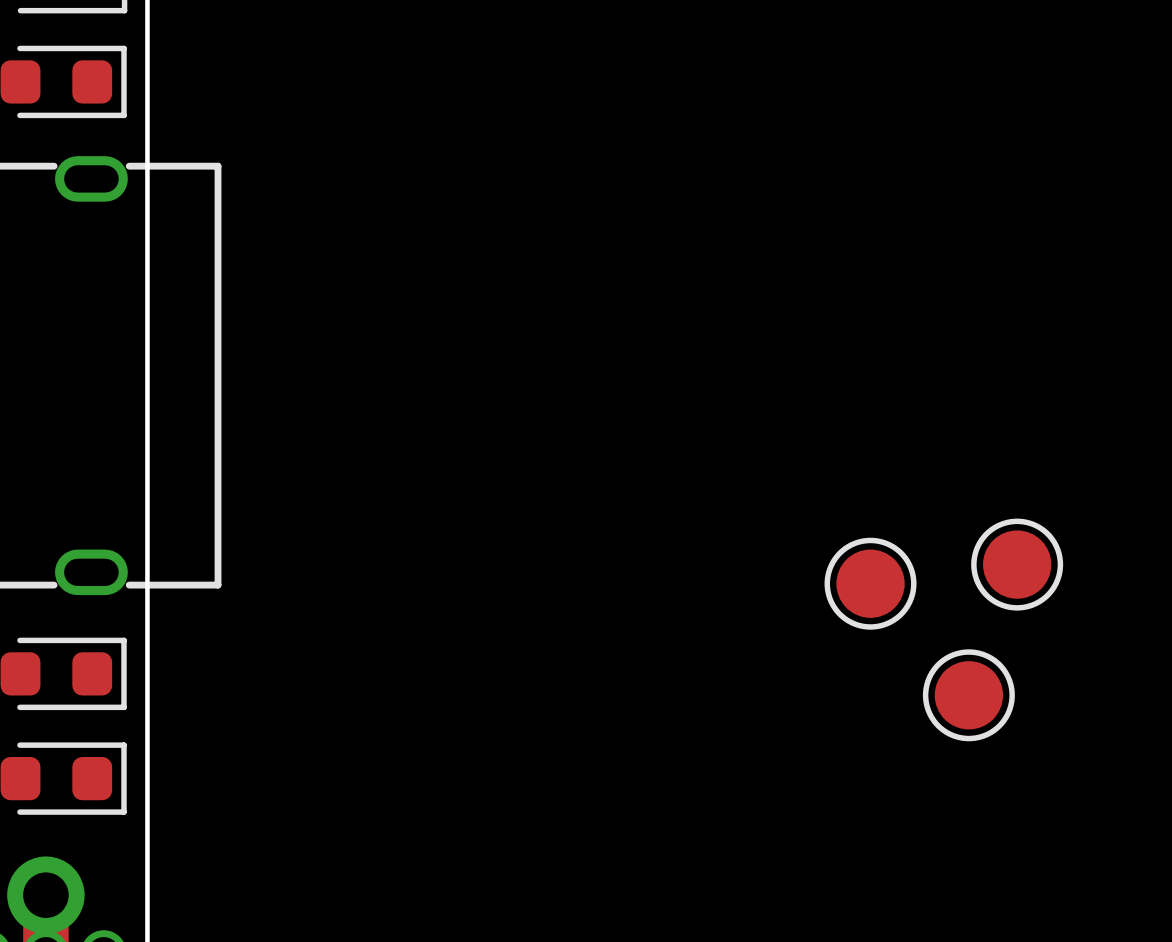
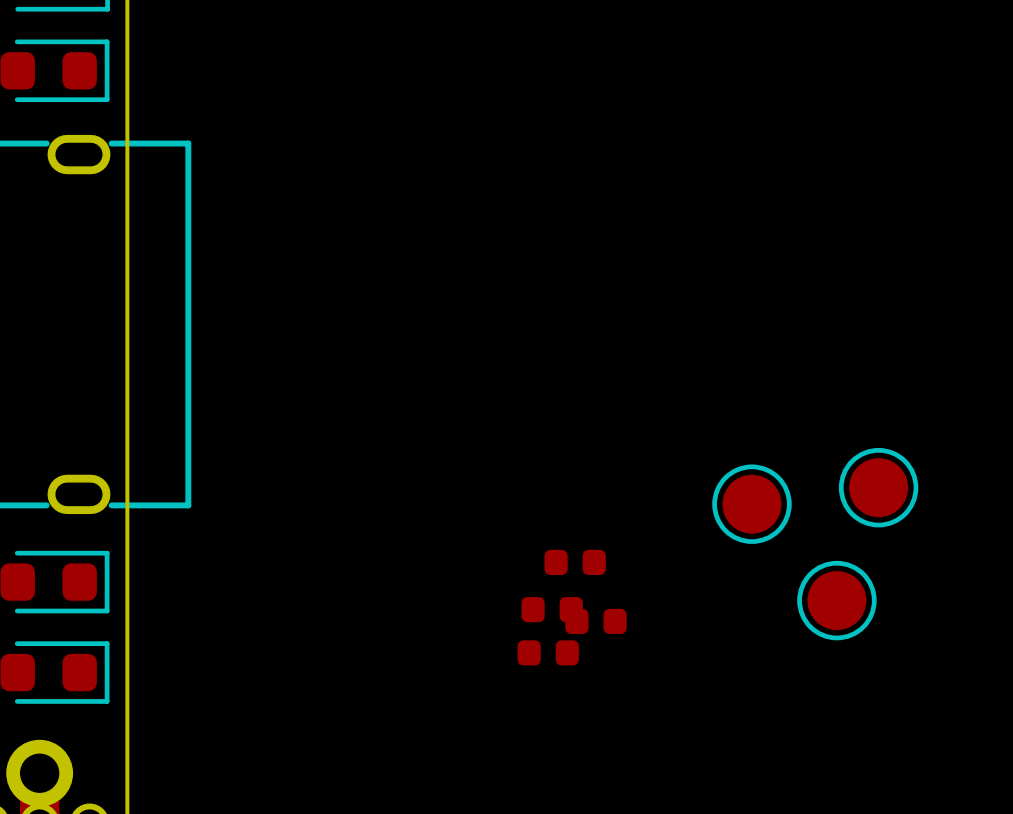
part: none -> (575, 562)
part: none -> (552, 609)
part: none -> (596, 621)
part: none -> (548, 652)

